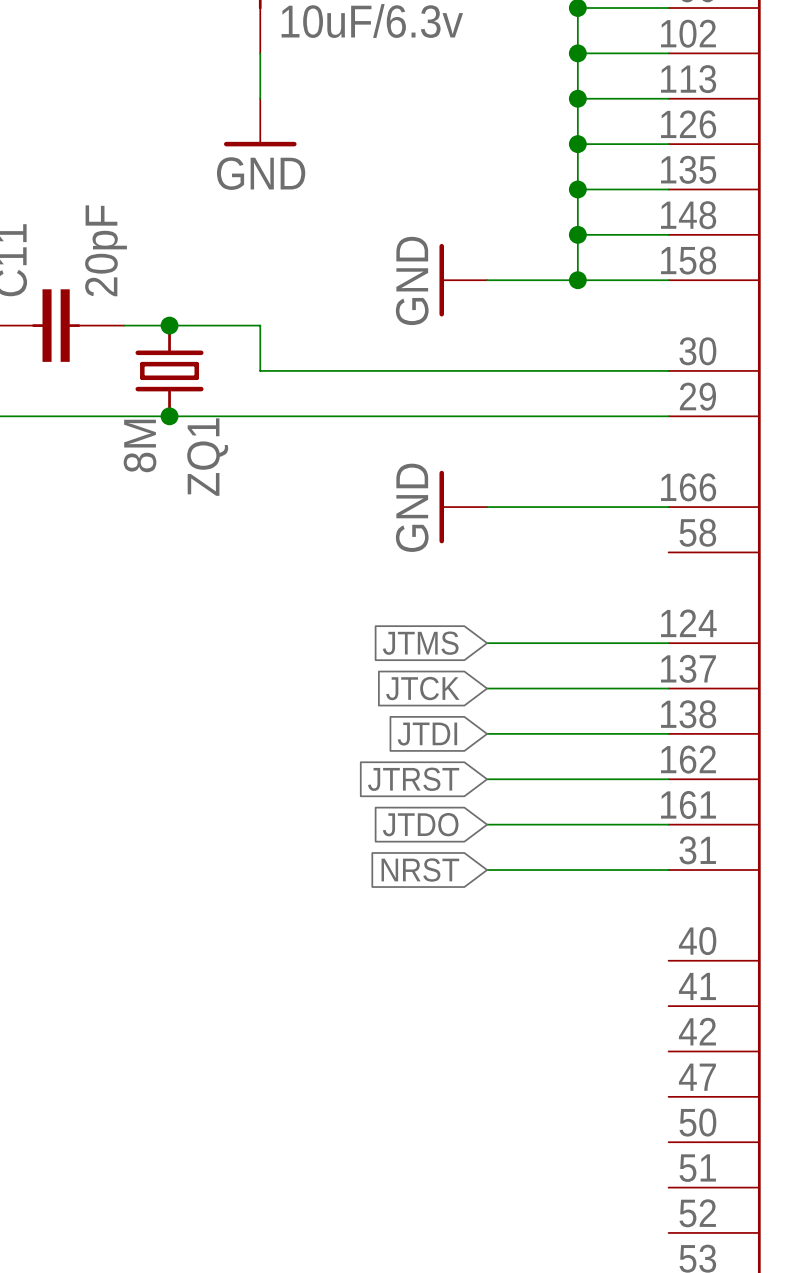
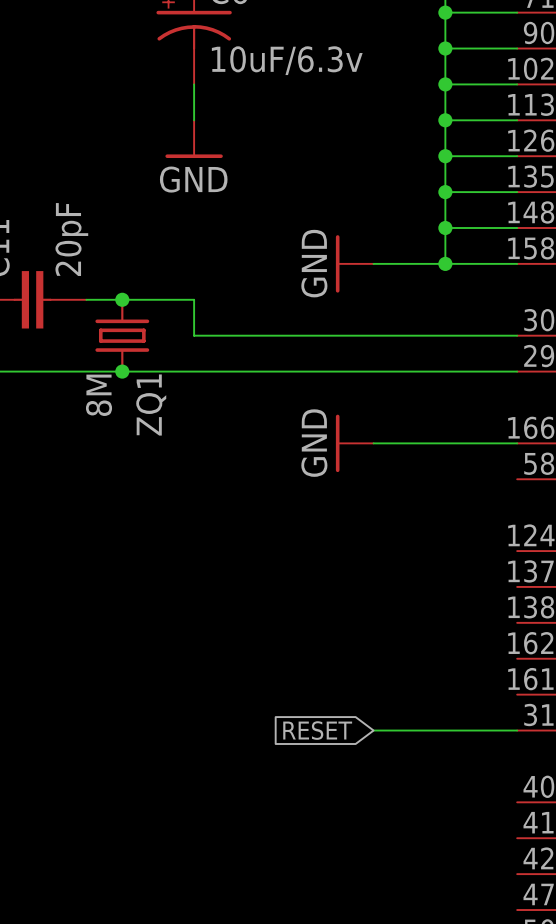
global label: JTMS (420, 643) -> none
wire: (487, 643) (668, 643) -> none
global label: JTCK (422, 688) -> none
wire: (487, 688) (668, 688) -> none
wire: (487, 733) (668, 733) -> none
global label: JTDI (427, 734) -> none
global label: JTRST (413, 779) -> none
wire: (487, 779) (668, 779) -> none
global label: JTDO (420, 824) -> none
wire: (487, 824) (668, 824) -> none
global label: NRST (420, 870) -> RESET (317, 730)

